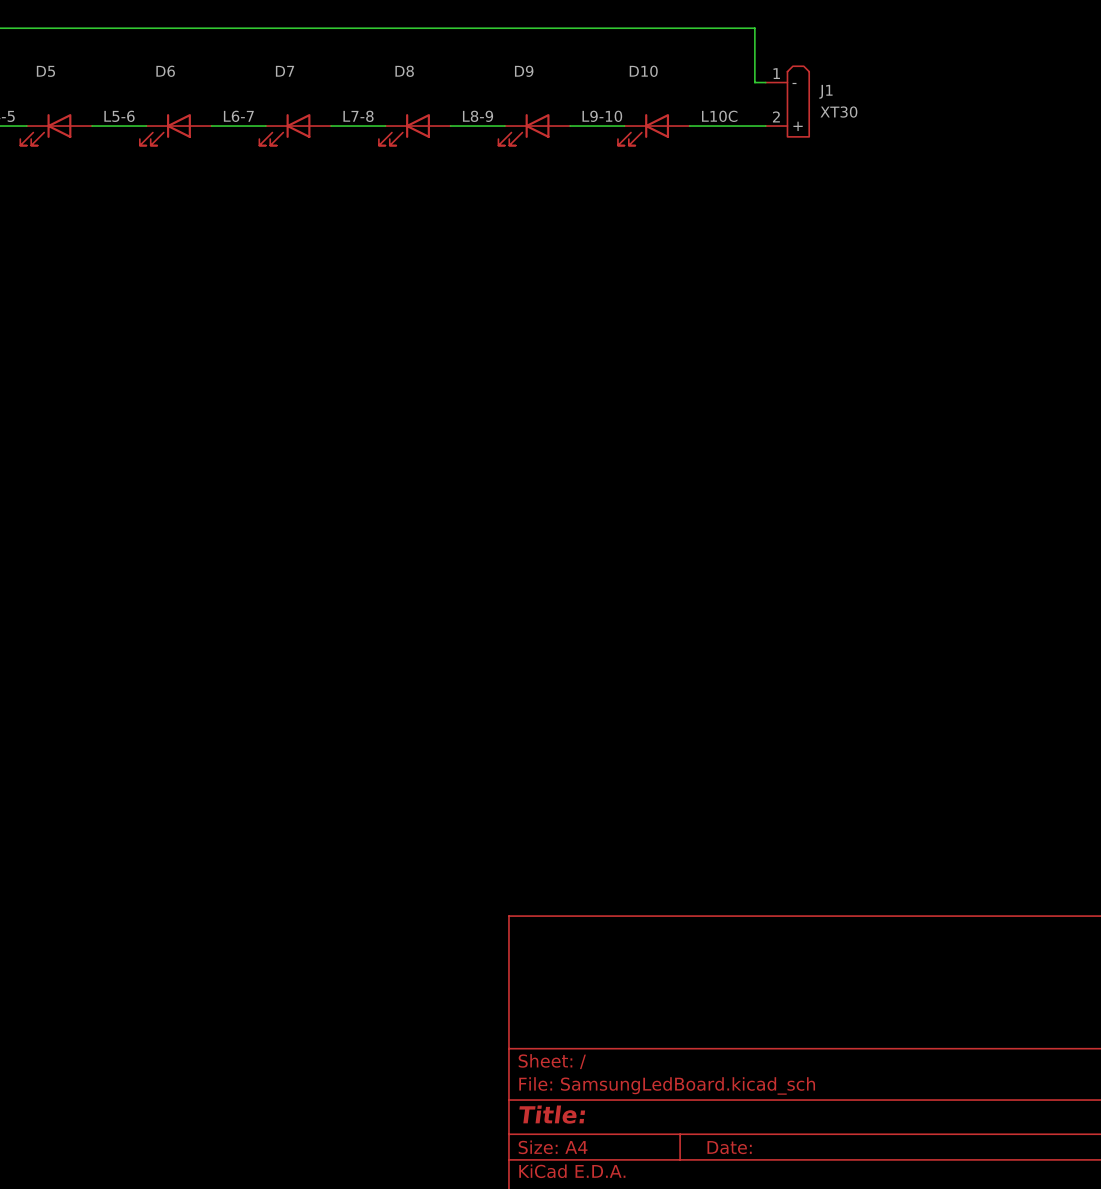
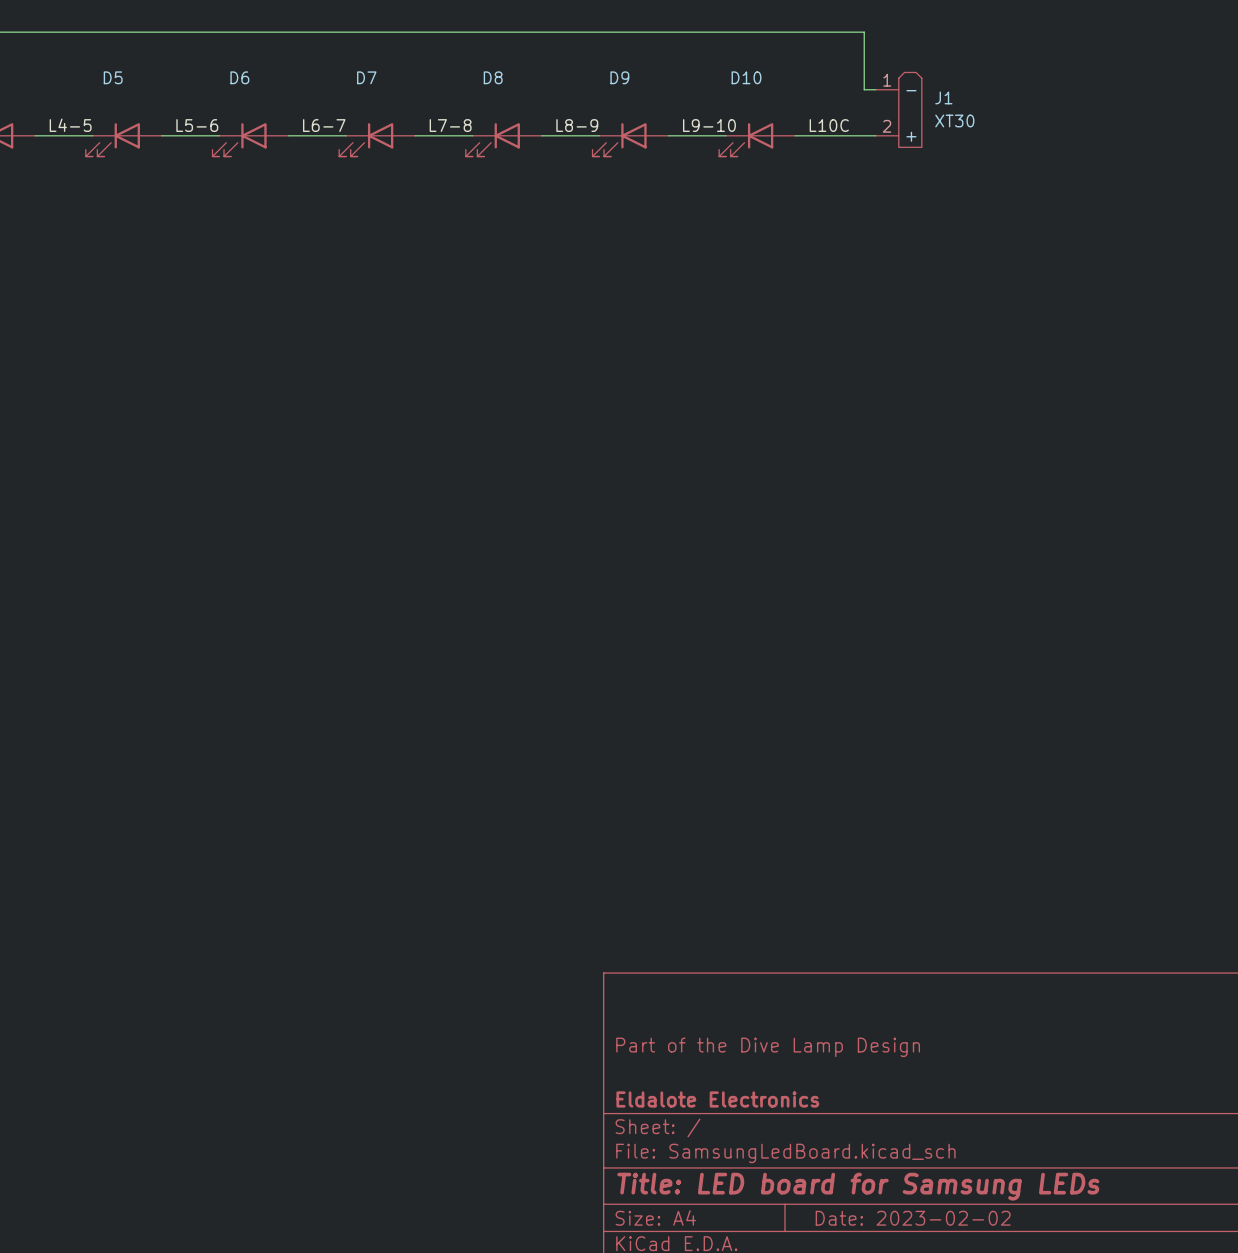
title block: none -> Part of the Dive Lamp Design (768, 1047)
title block: none -> Eldalote Electronics (717, 1099)
title block: Title: (552, 1114) -> Title: LED board for Samsung LEDs (858, 1186)
title block: Date: (729, 1147) -> Date: 2023-02-02 (913, 1218)

